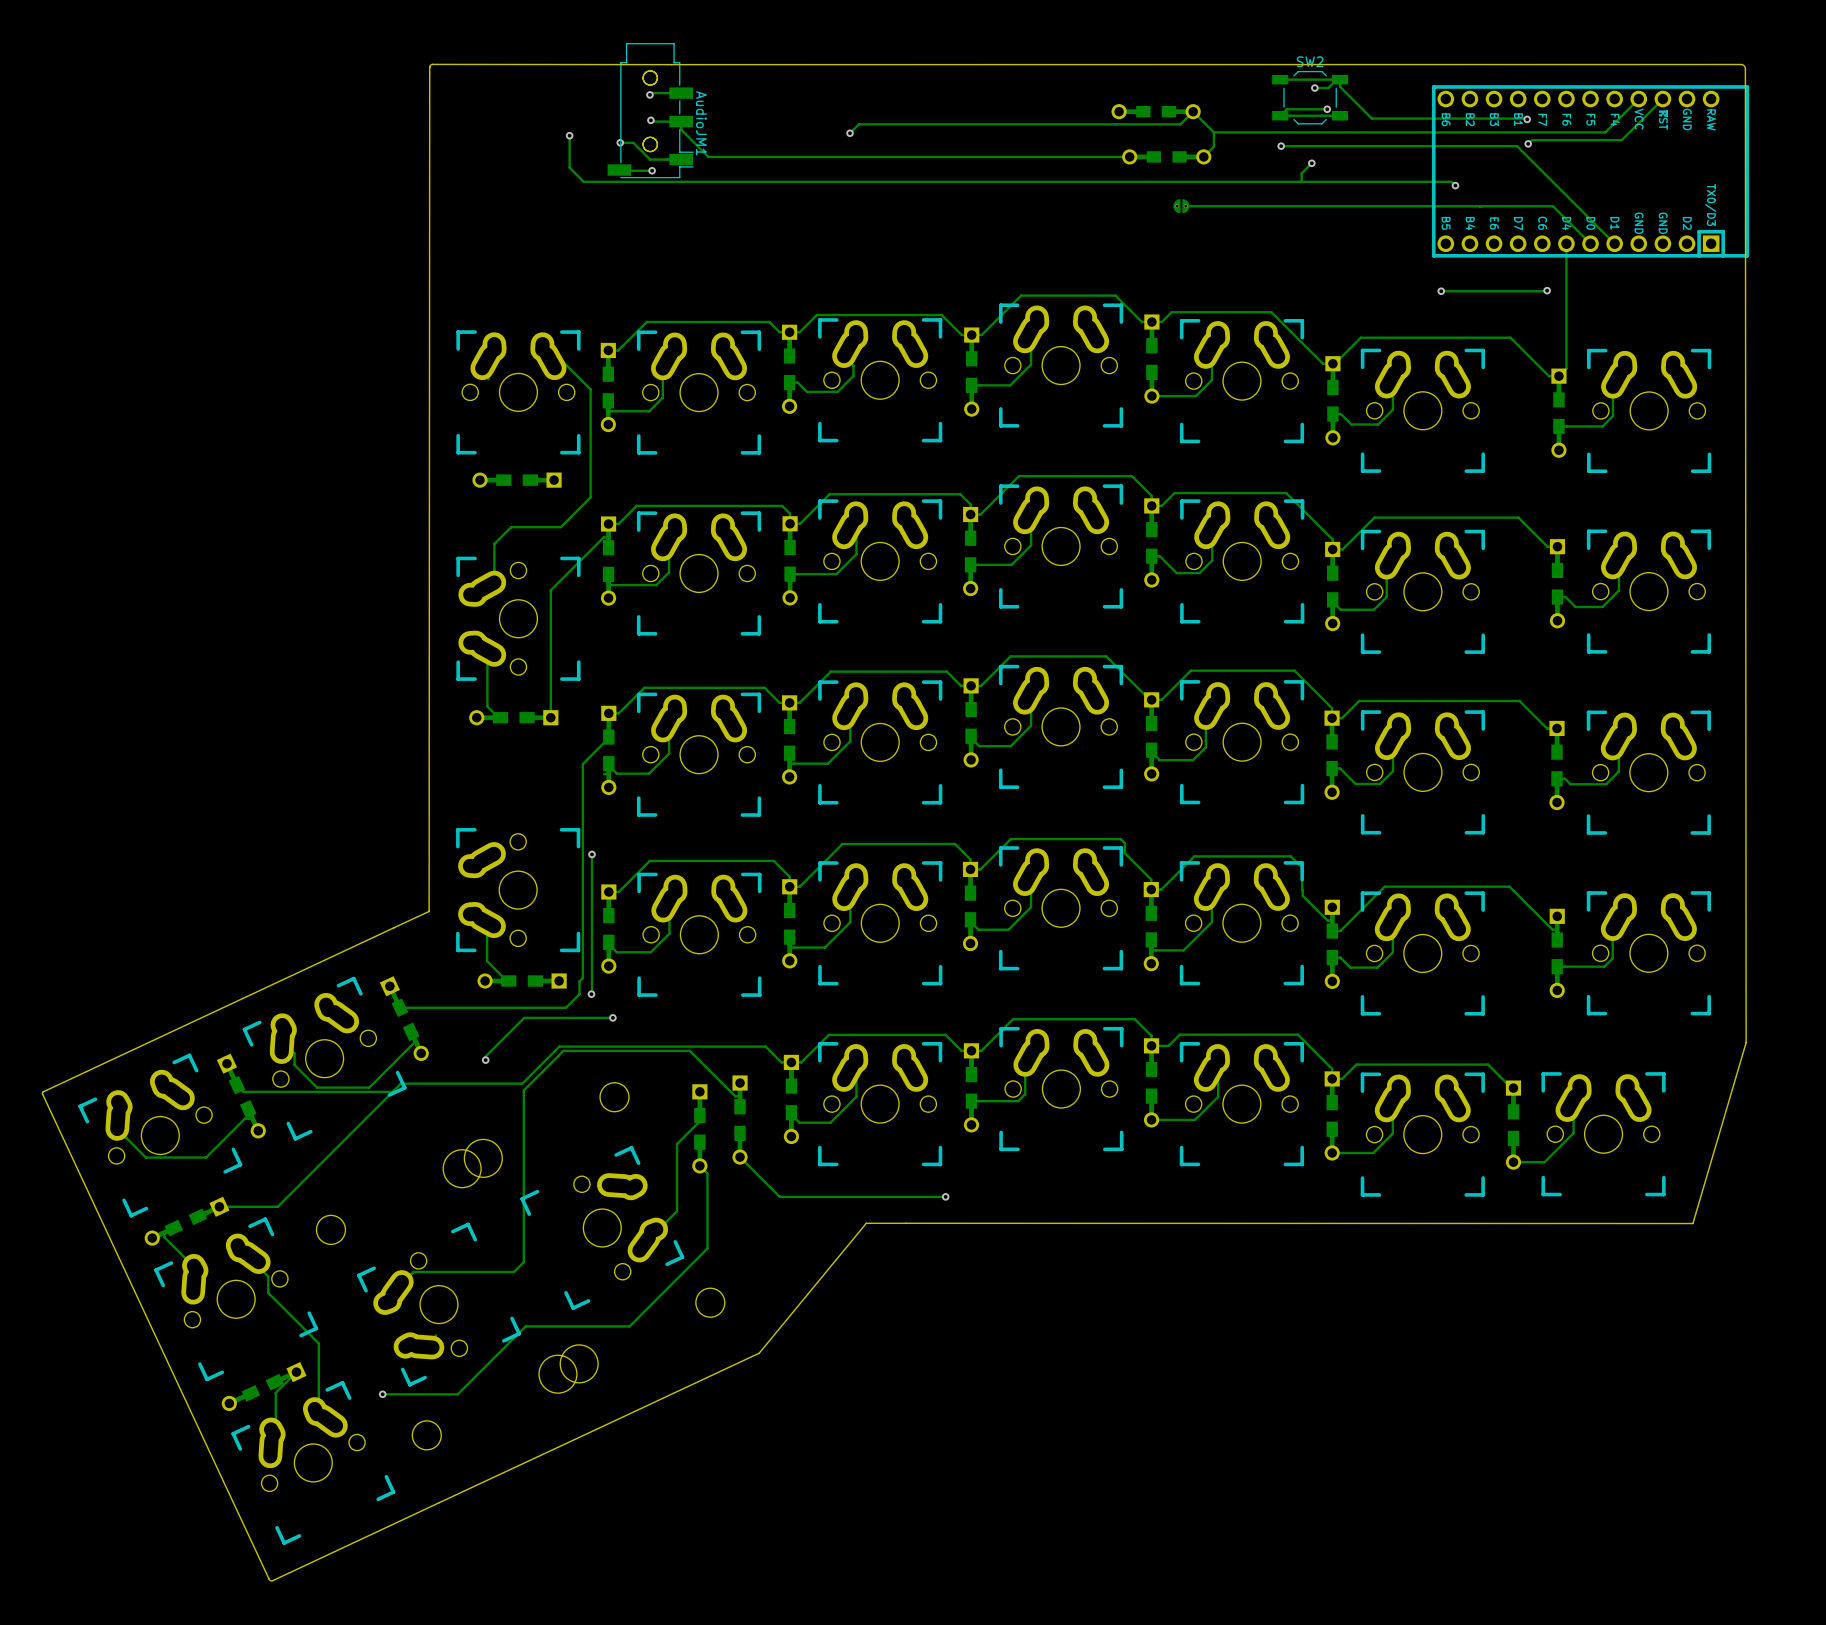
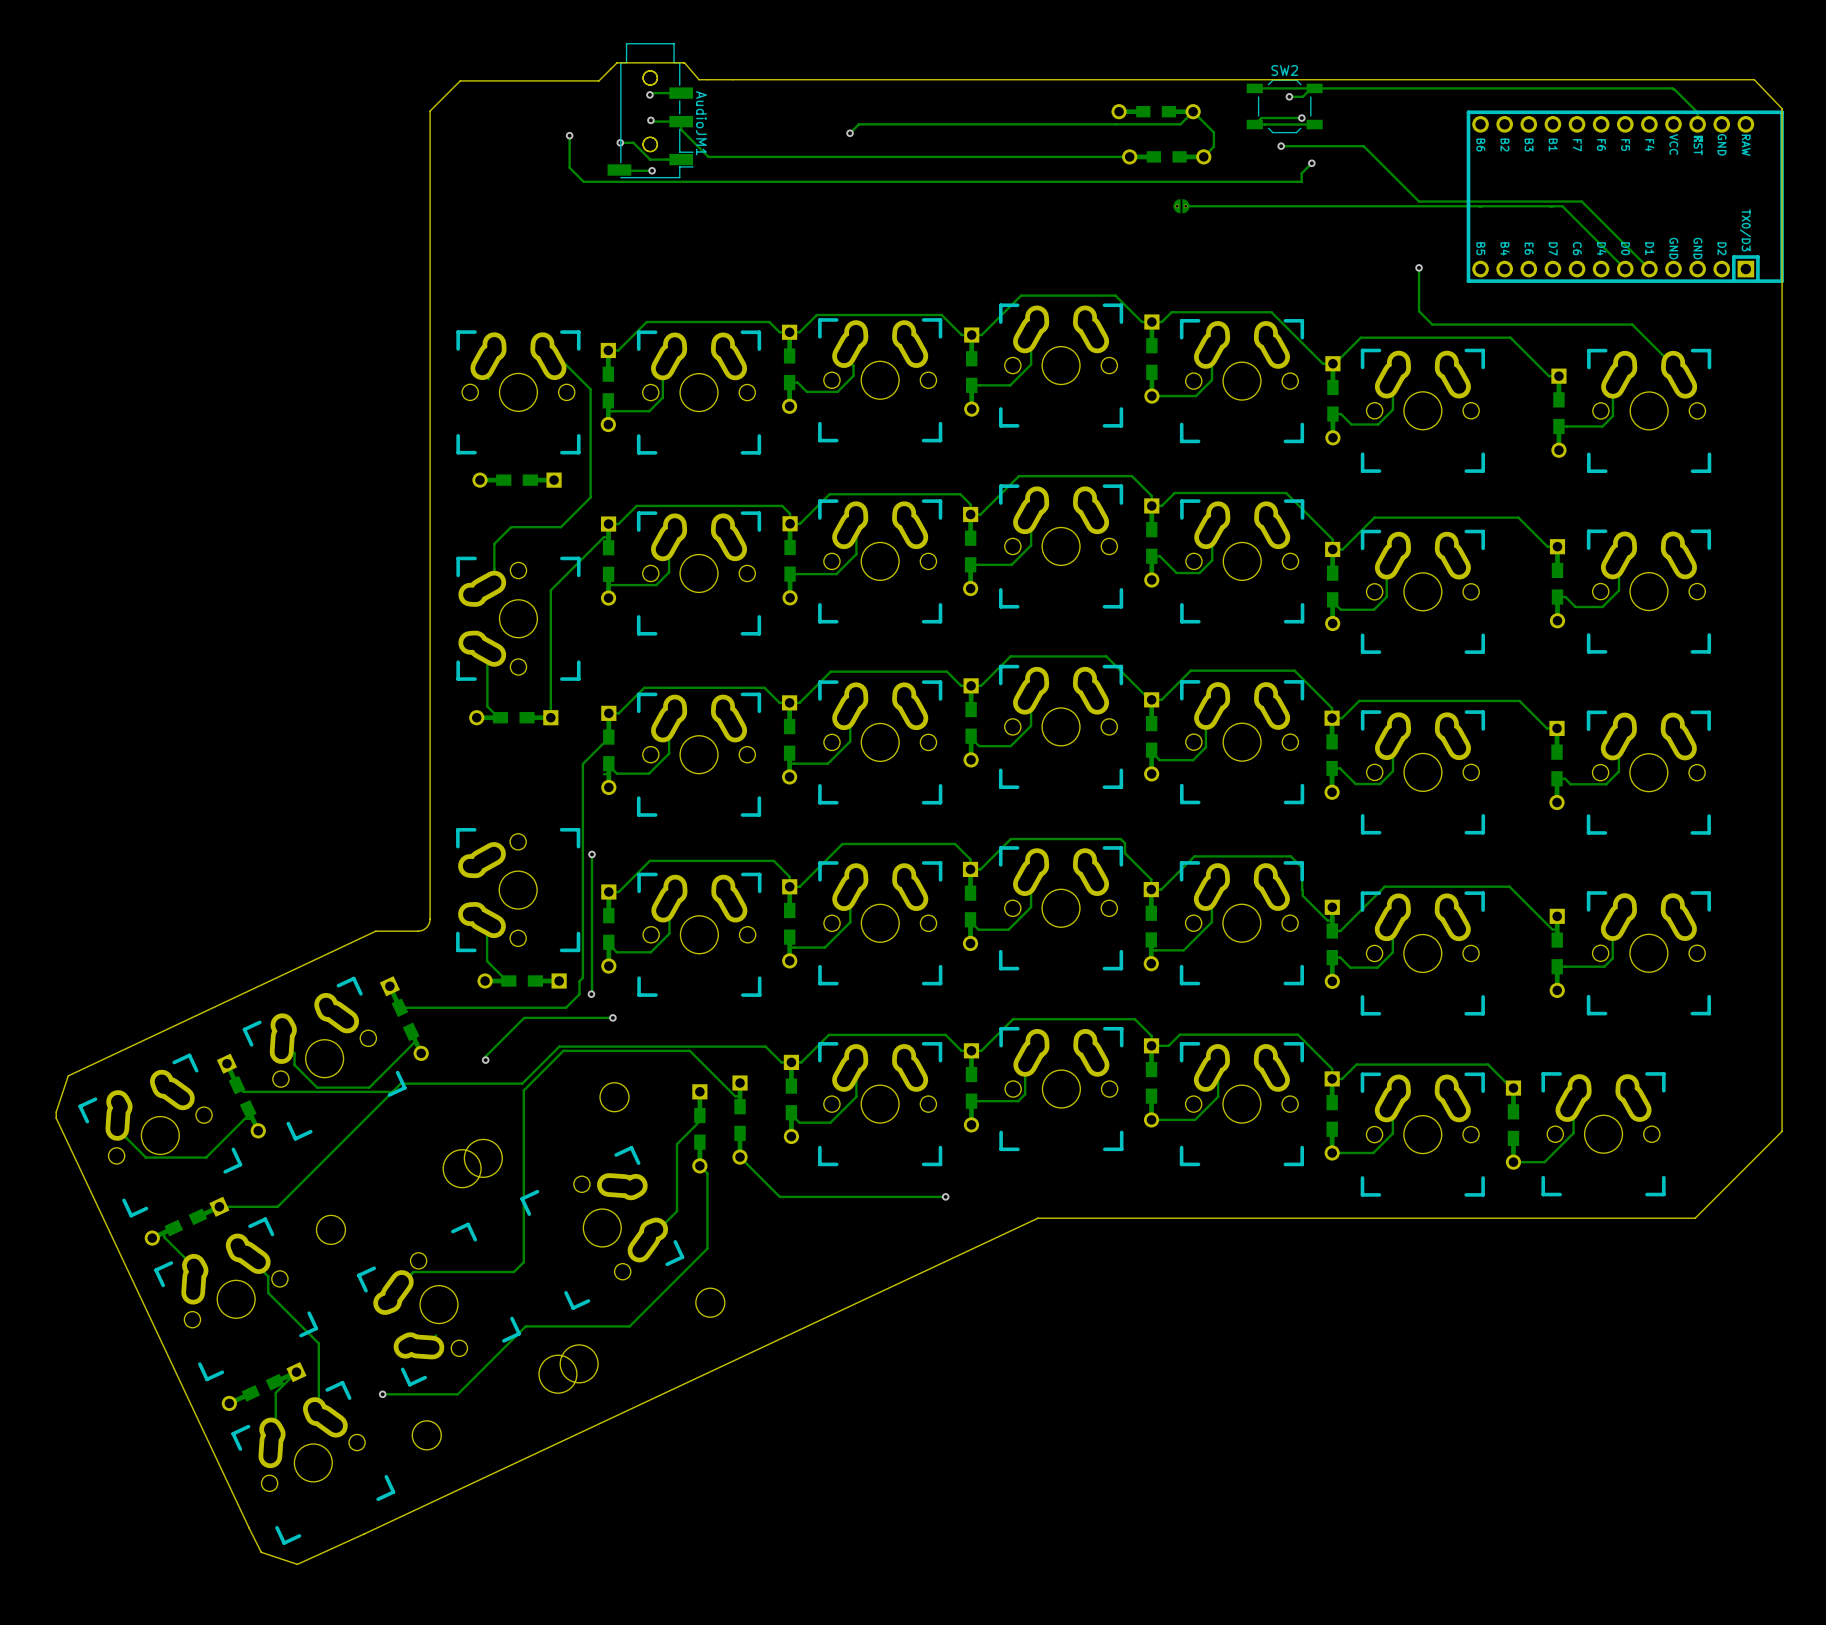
board edge: (432, 64) (429, 67) -> none
board edge: (432, 64) (1740, 64) -> none
board edge: (1741, 64) (1745, 68) -> none
board edge: (429, 66) (429, 72) -> none
board edge: (1745, 69) (1746, 1042) -> none
board edge: (429, 72) (429, 911) -> none
track: (1280, 79) (1340, 79) (1340, 86) (1371, 118) (1527, 119) -> none
track: (1336, 79) (1328, 88) (1314, 88) -> (1311, 88) (1302, 96) (1289, 96)
track: none -> (1254, 88) (1672, 88) (1697, 112) (1697, 124)
via: (1314, 88) -> none
via: none -> (1289, 96)
SW2 position: (1310, 97) -> (1284, 106)
track: (1638, 99) (1605, 132) (1213, 132) -> none
track: (1662, 99) (1621, 140) (1531, 140) (1528, 143) -> none
track: (1327, 109) (1286, 109) (1280, 115) (1340, 115) -> (1301, 118) (1261, 118) (1254, 124) (1314, 124)
via: (1327, 109) -> none
via: none -> (1301, 118)
via: (1527, 119) -> none
via: (1528, 143) -> none
track: (1363, 146) (1517, 146) (1614, 243) -> (1363, 146) (1419, 201) (1581, 201) (1649, 269)
part position: (1590, 171) -> (1625, 196)
track: (1301, 181) (1451, 181) (1455, 185) -> none
via: (1455, 185) -> none
track: (1553, 206) (1590, 243) -> (1553, 206) (1562, 206) (1625, 269)
track: (1566, 243) (1566, 368) (1558, 376) -> none
track: none -> (1419, 267) (1419, 311) (1432, 324) (1632, 324) (1673, 365)
track: (1547, 290) (1441, 291) -> none
via: (1547, 290) -> none
via position: (1441, 291) -> (1419, 267)
board edge: (429, 911) (43, 1091) -> none
board edge: none -> (418, 931) (375, 931) (68, 1075) (56, 1112) (56, 1118) (261, 1552) (297, 1564) (1037, 1218) (1695, 1218) (1782, 1131) (1782, 108) (1754, 79) (699, 79) (684, 62) (617, 62) (598, 80) (460, 80) (430, 111) (430, 919) (426, 927) (418, 931)
board edge: (1746, 1042) (1692, 1223) (866, 1223) (759, 1353) (273, 1580) -> none
board edge: (42, 1092) (42, 1094) -> none
board edge: (42, 1094) (269, 1579) -> none
board edge: (269, 1579) (272, 1580) -> none

